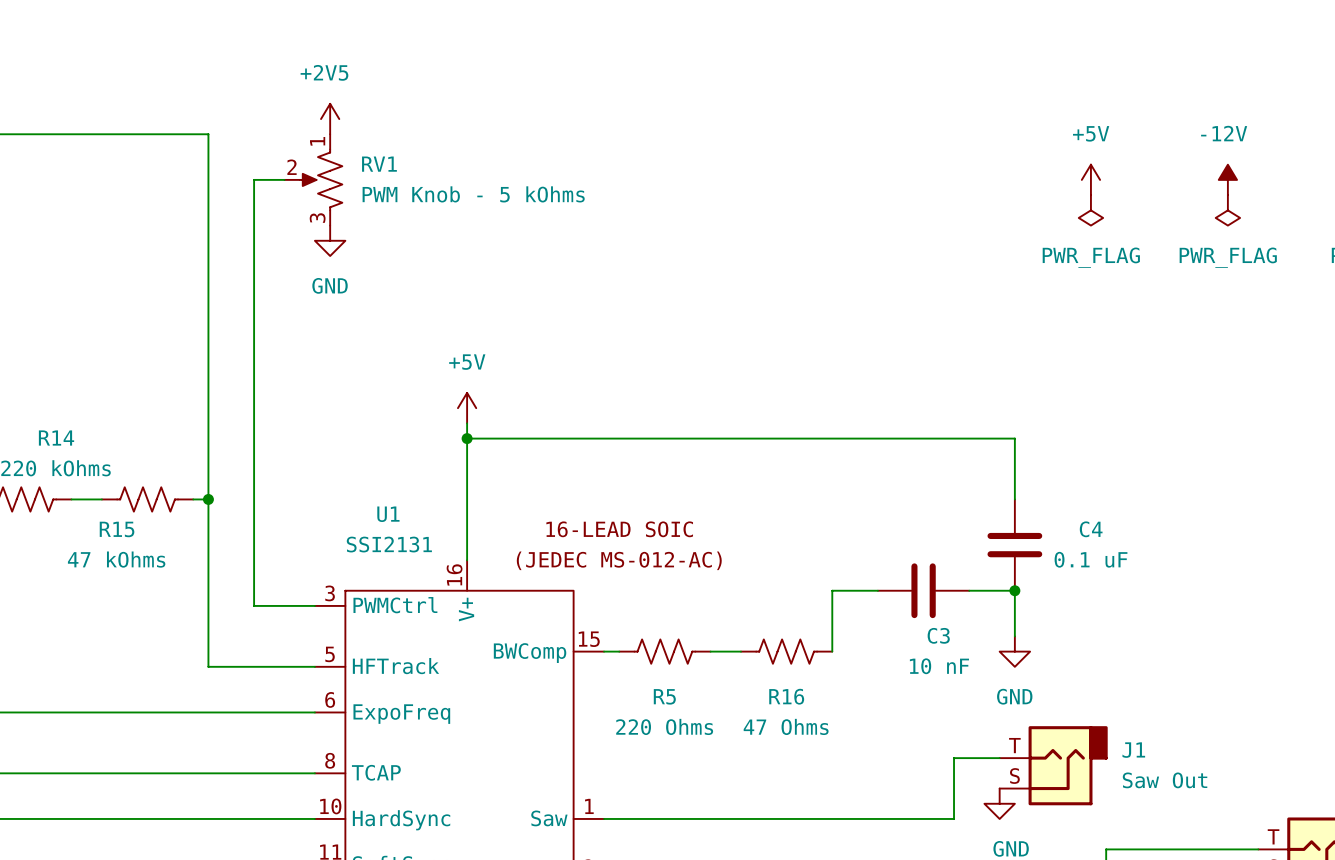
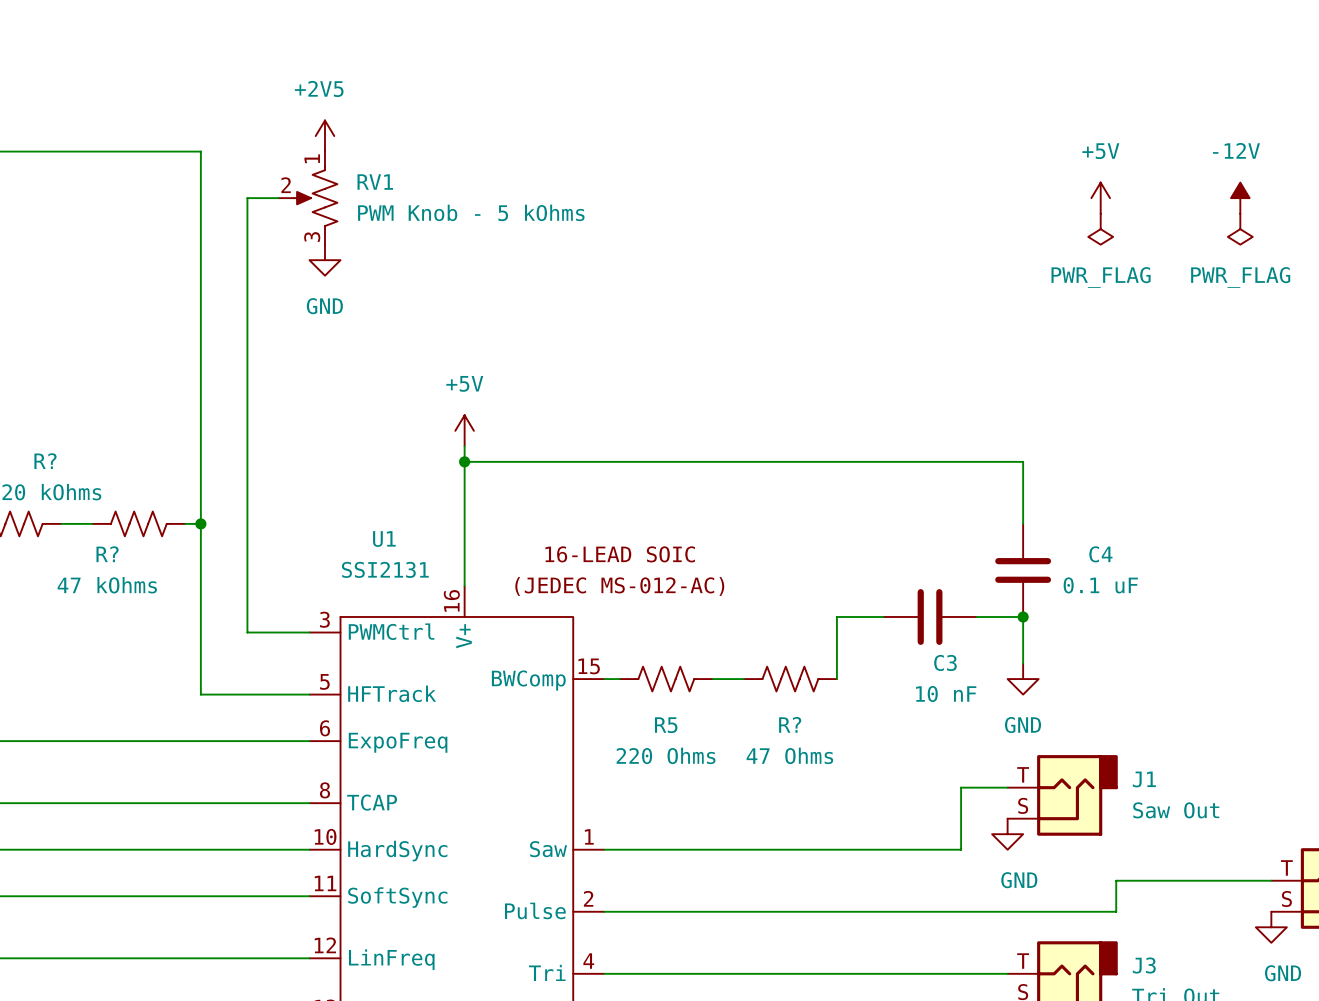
R14 name: R14 (56, 438) -> R? (45, 461)
R15 name: R15 (117, 529) -> R? (107, 554)
R16 name: R16 (786, 696) -> R? (790, 724)

